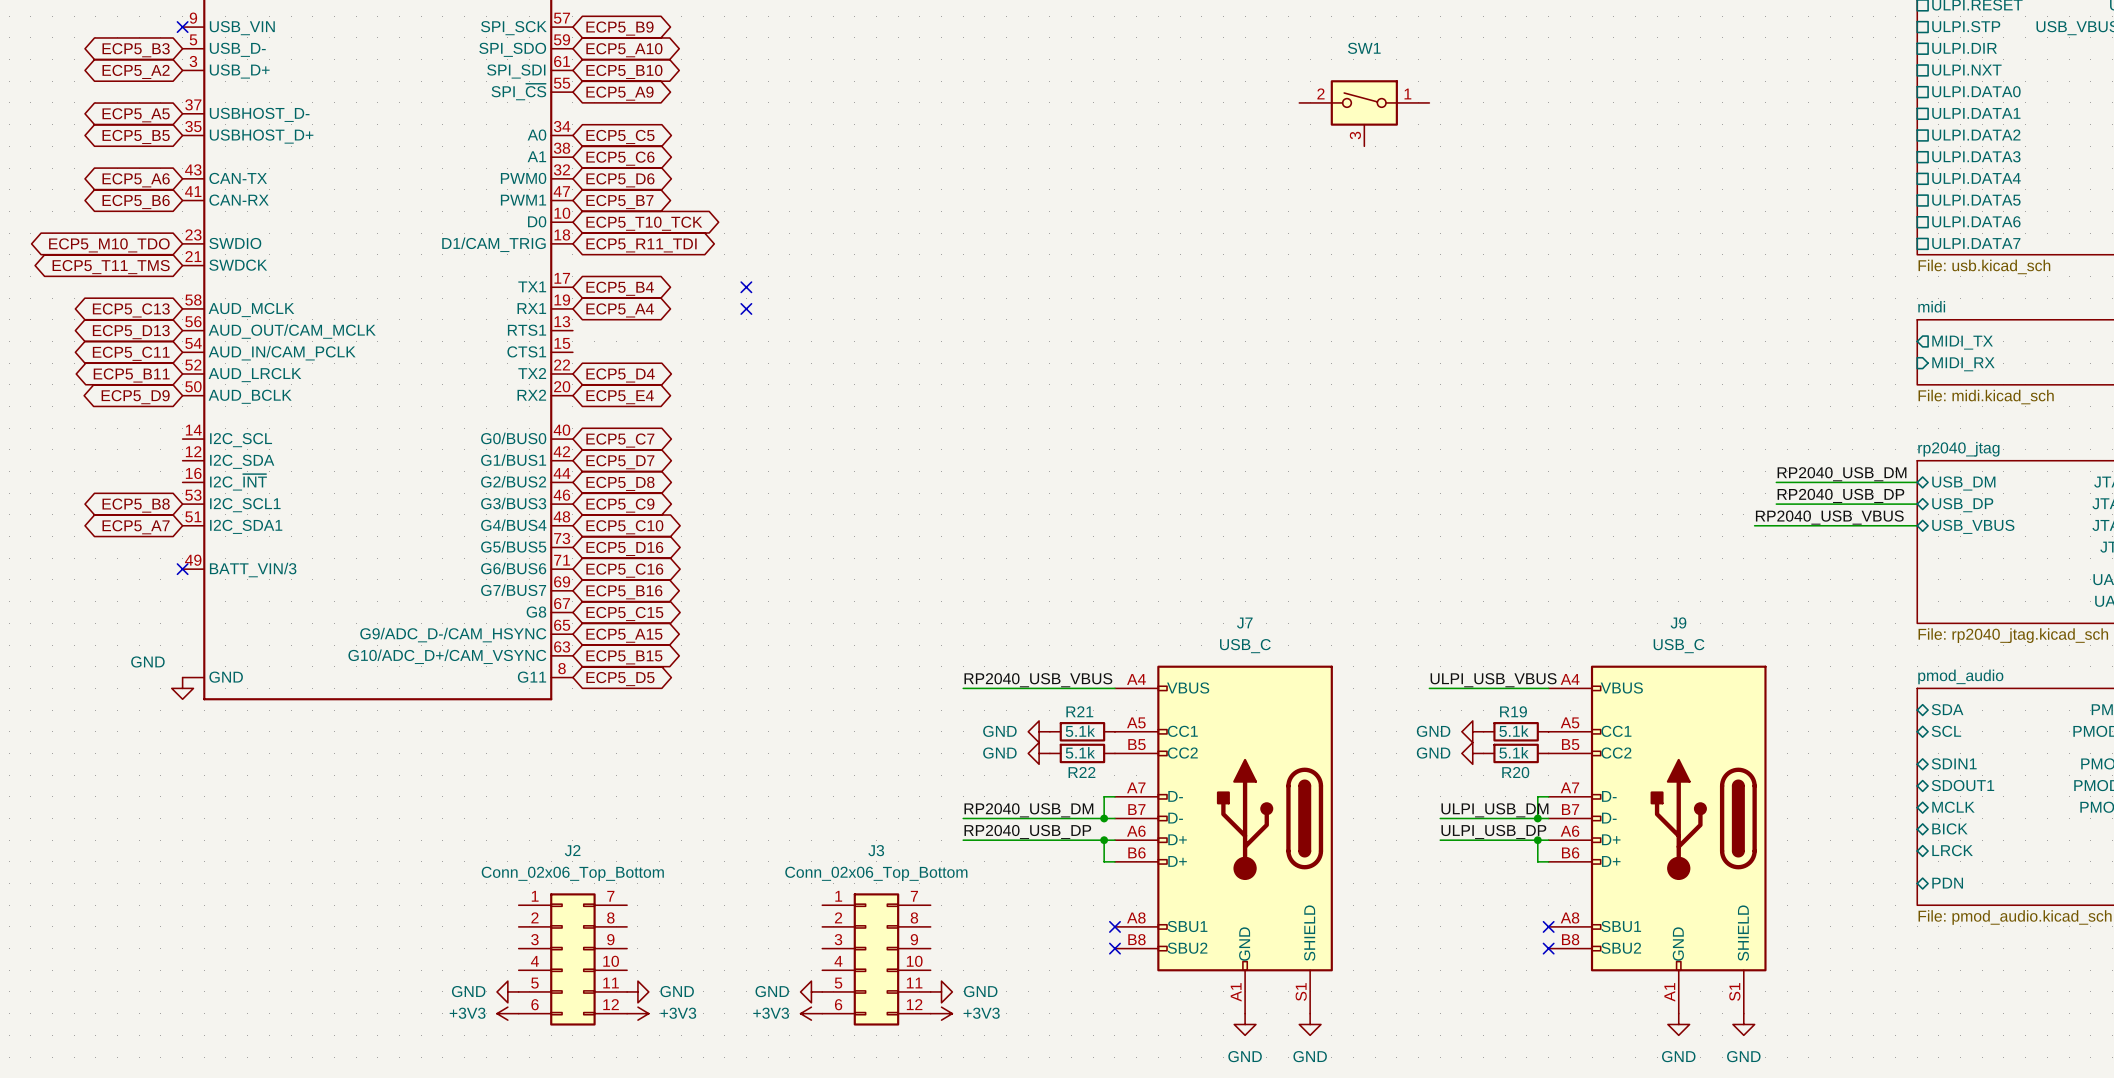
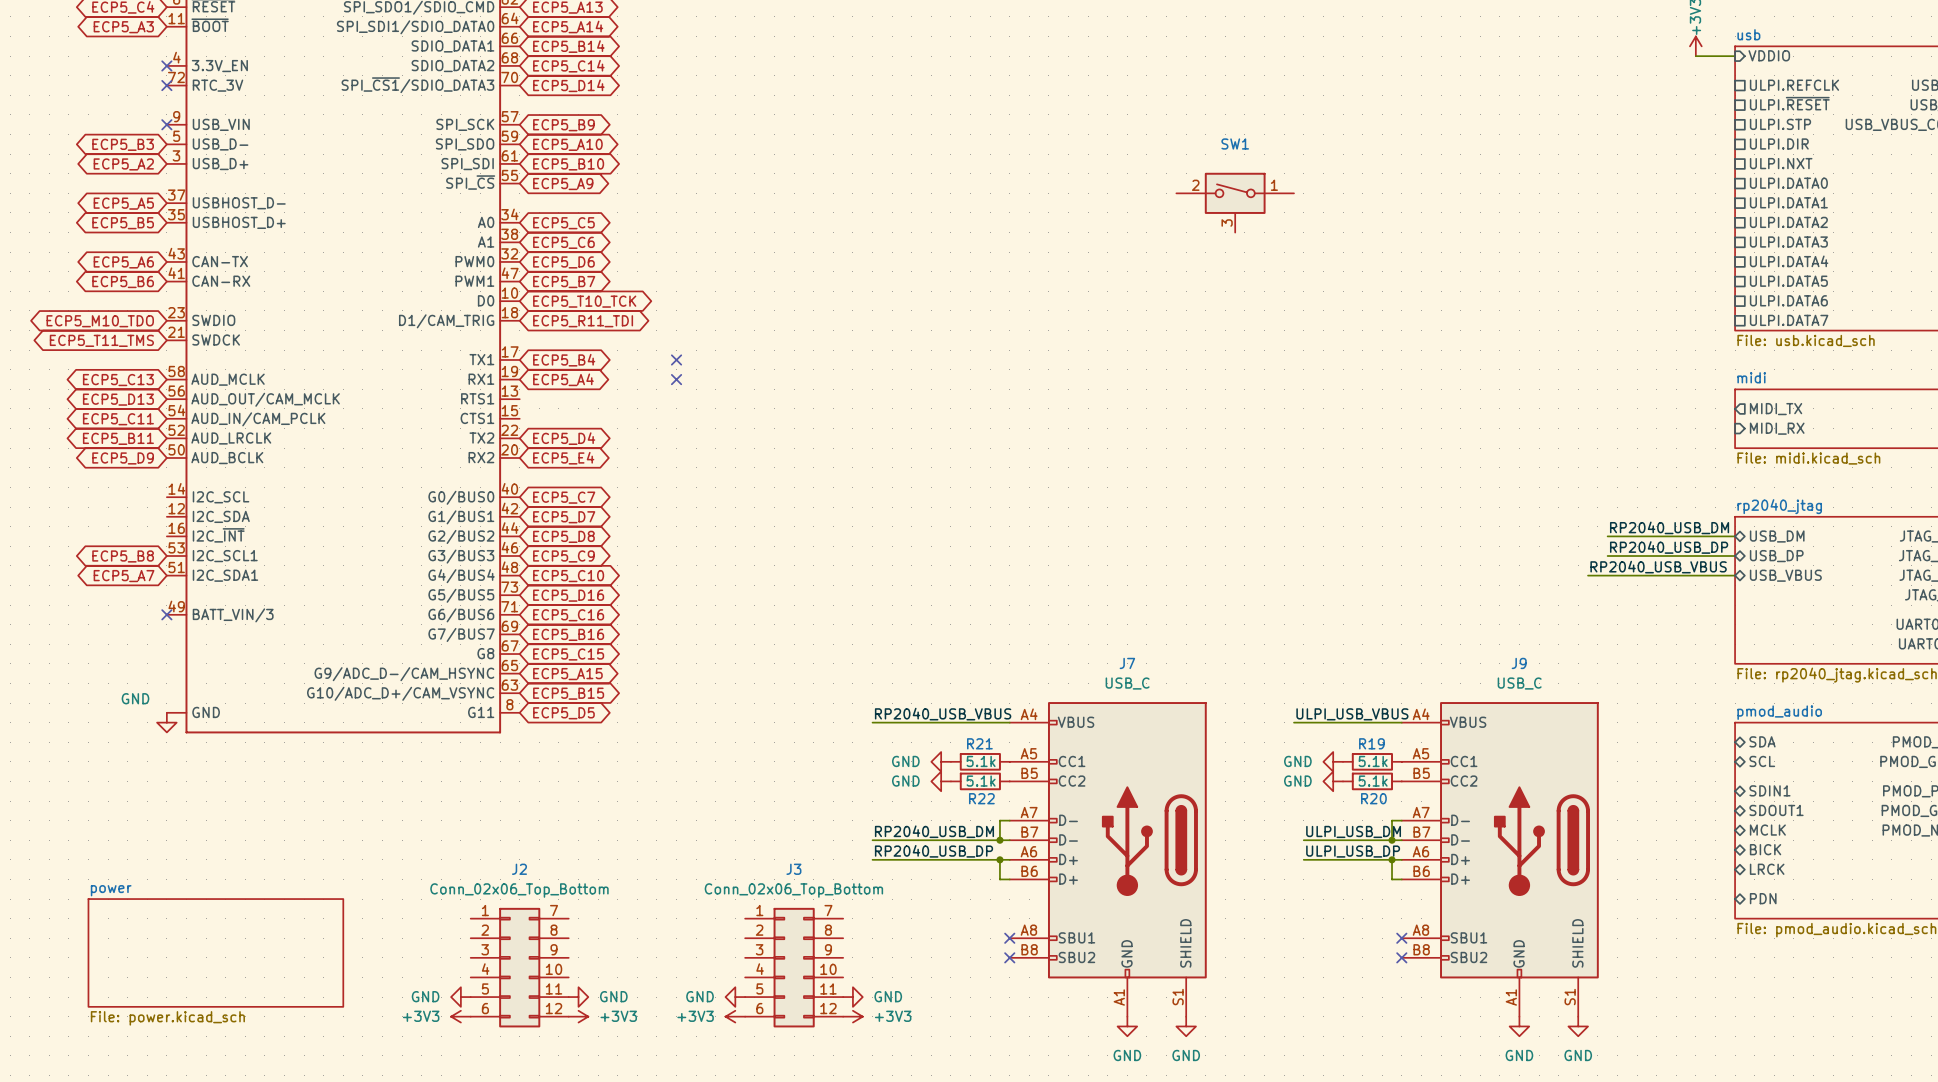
sheet power: none -> File: power.kicad_sch (215, 952)

